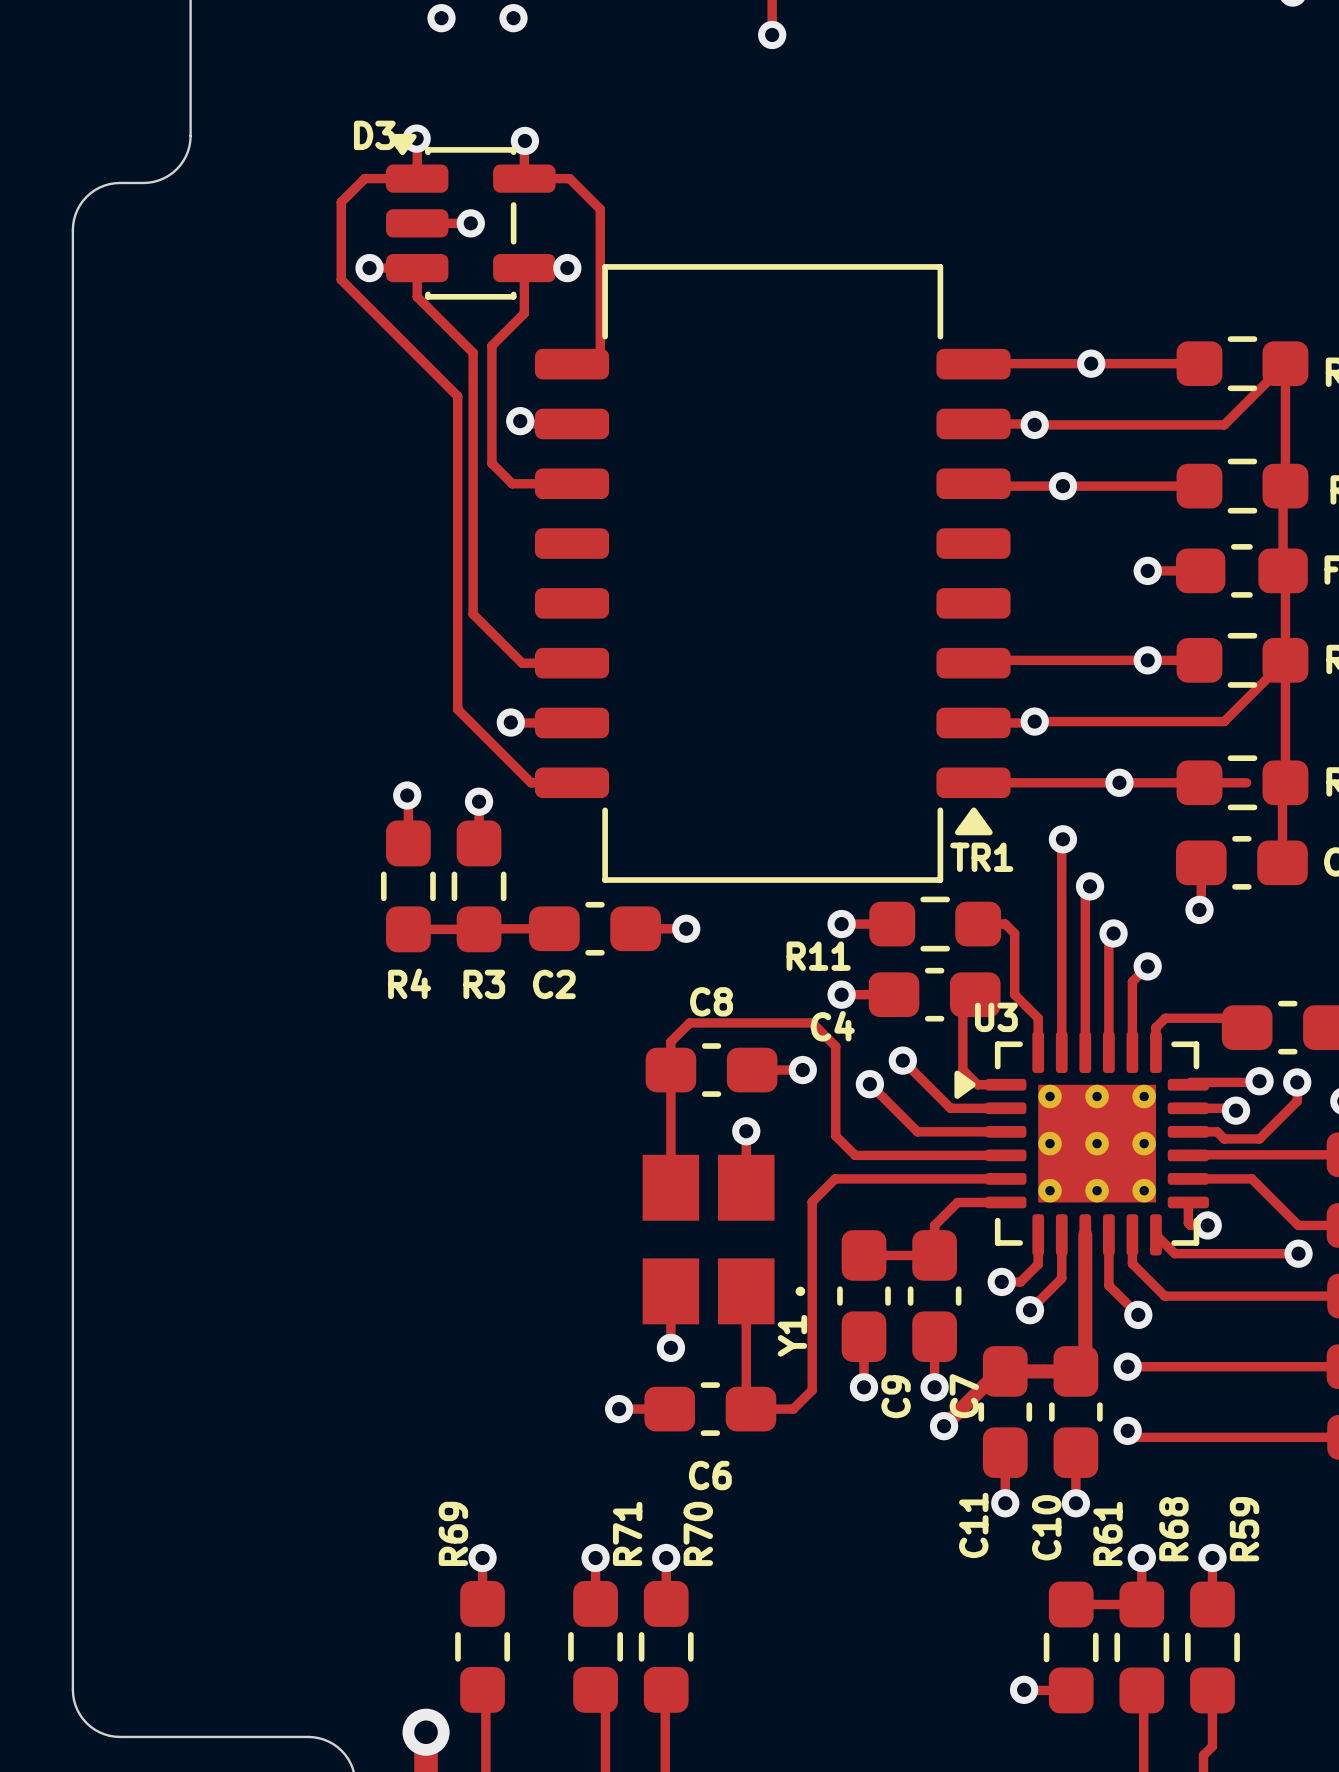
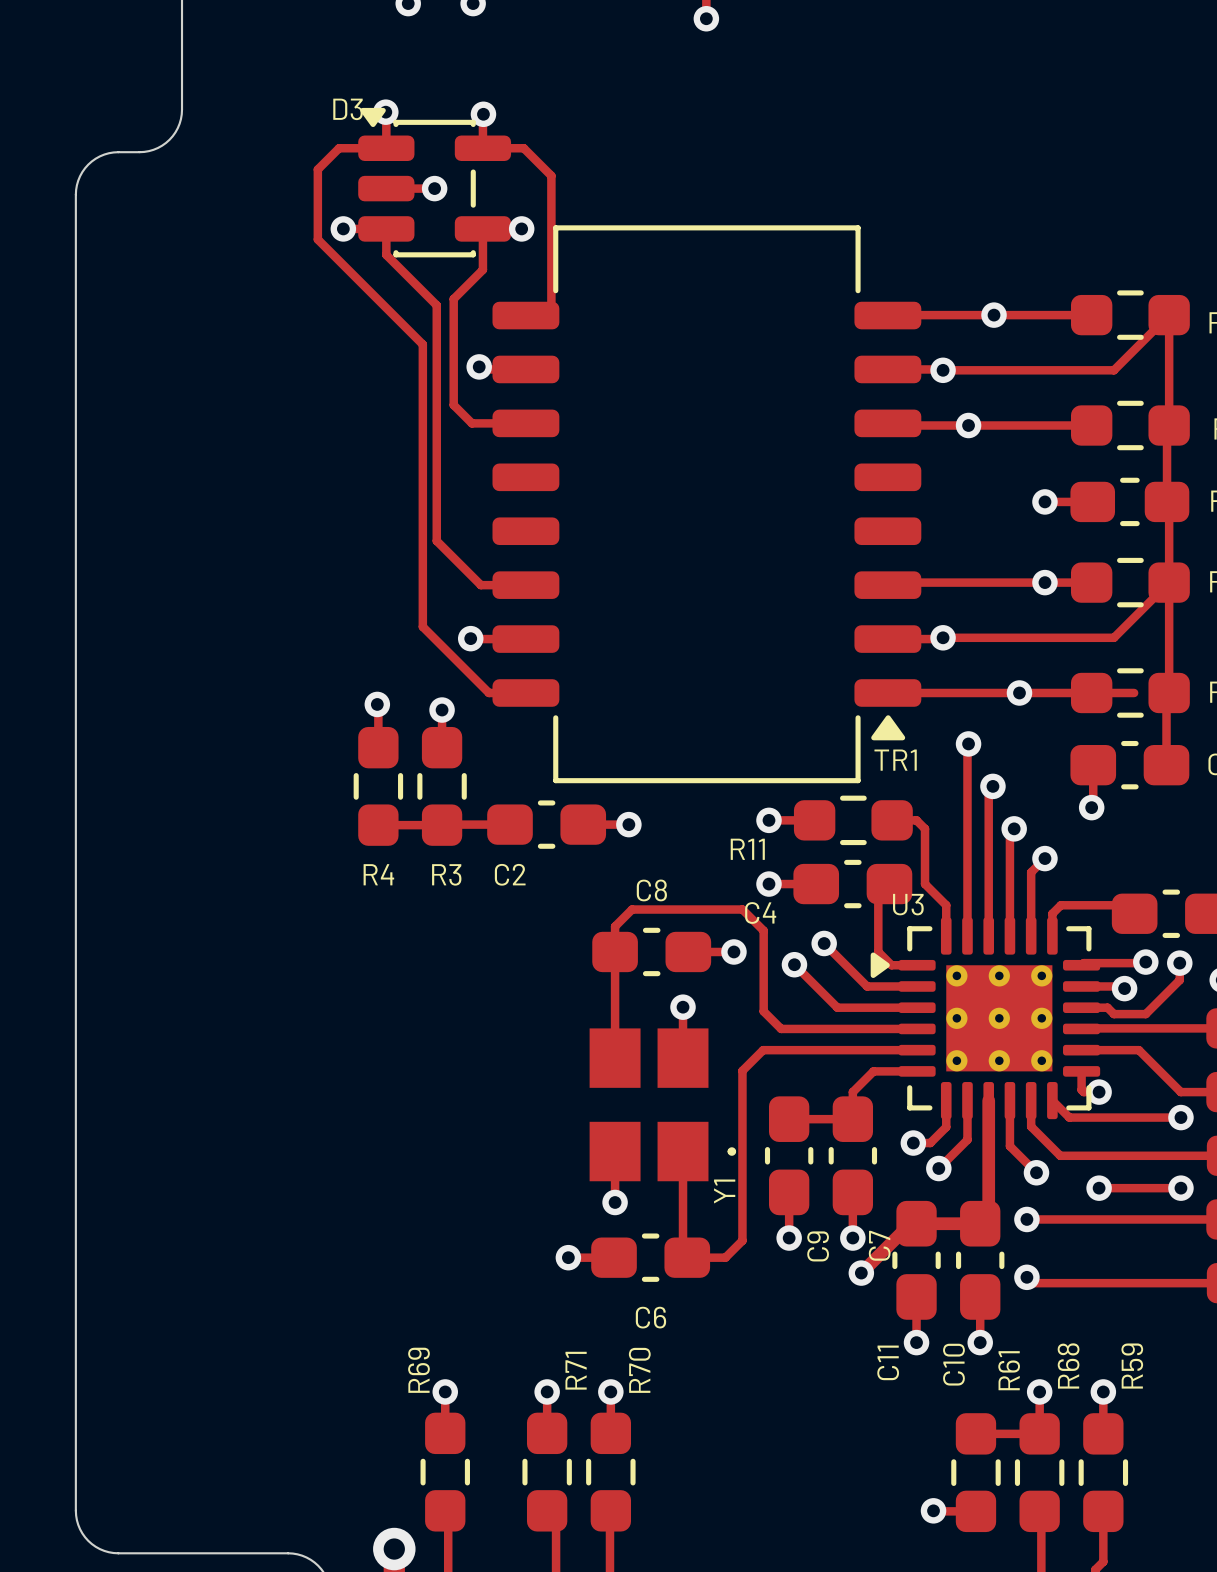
track: none -> (1099, 1188) (1180, 1188)
via: none -> (1099, 1188)
via: none -> (1180, 1188)

